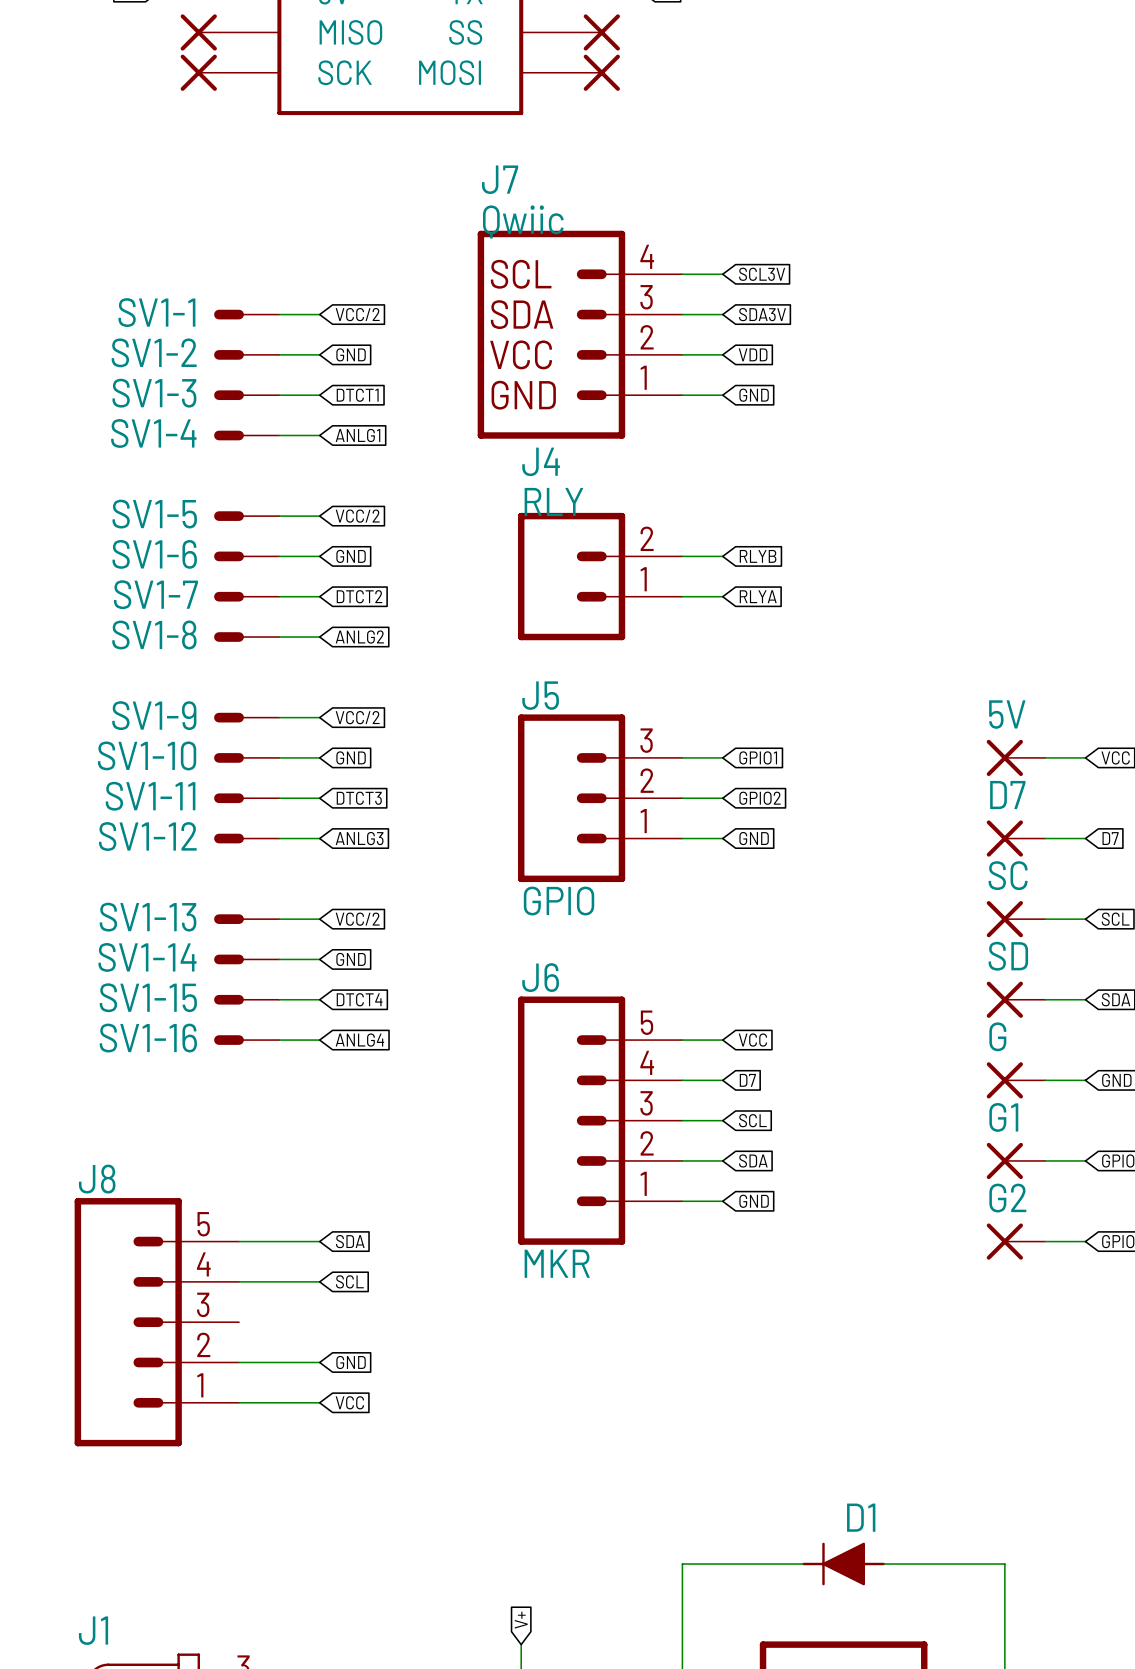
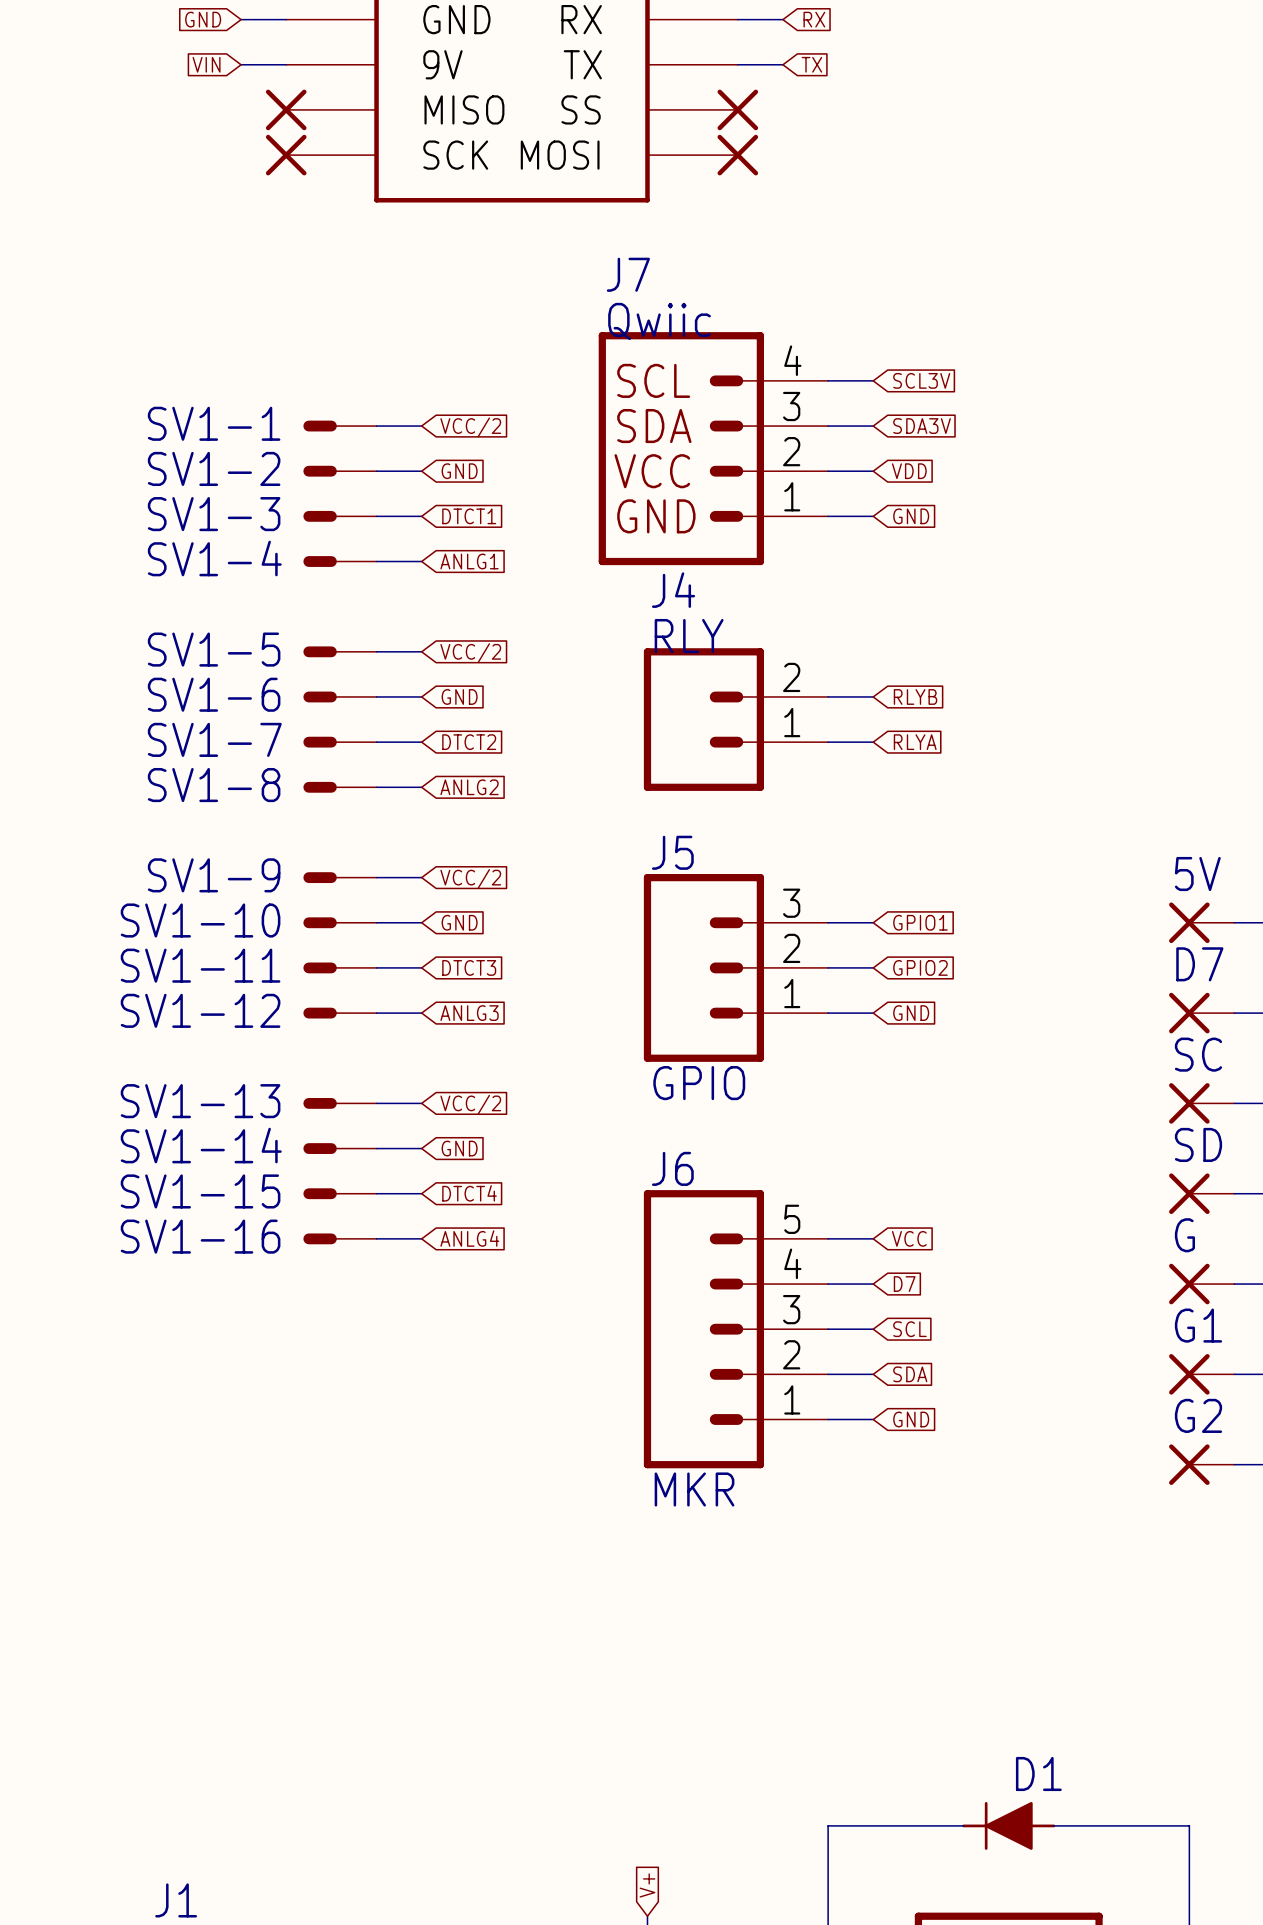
wire: (239, 1241) (319, 1241) -> none
global label: SDA (350, 1241) -> none
wire: (239, 1281) (319, 1281) -> none
global label: SCL (349, 1281) -> none
J8: (156, 1322) -> none
wire: (239, 1362) (319, 1362) -> none
global label: GND (351, 1362) -> none
wire: (239, 1402) (319, 1402) -> none
global label: VCC (349, 1402) -> none

